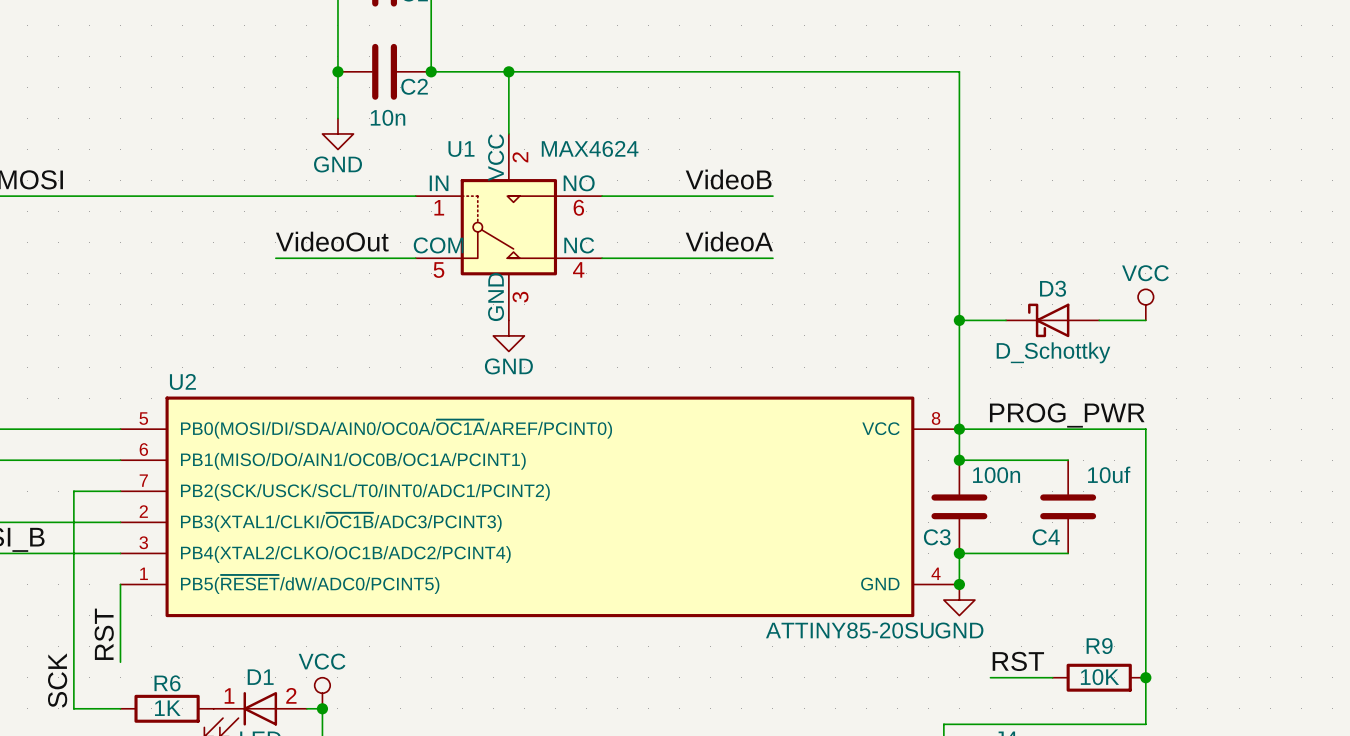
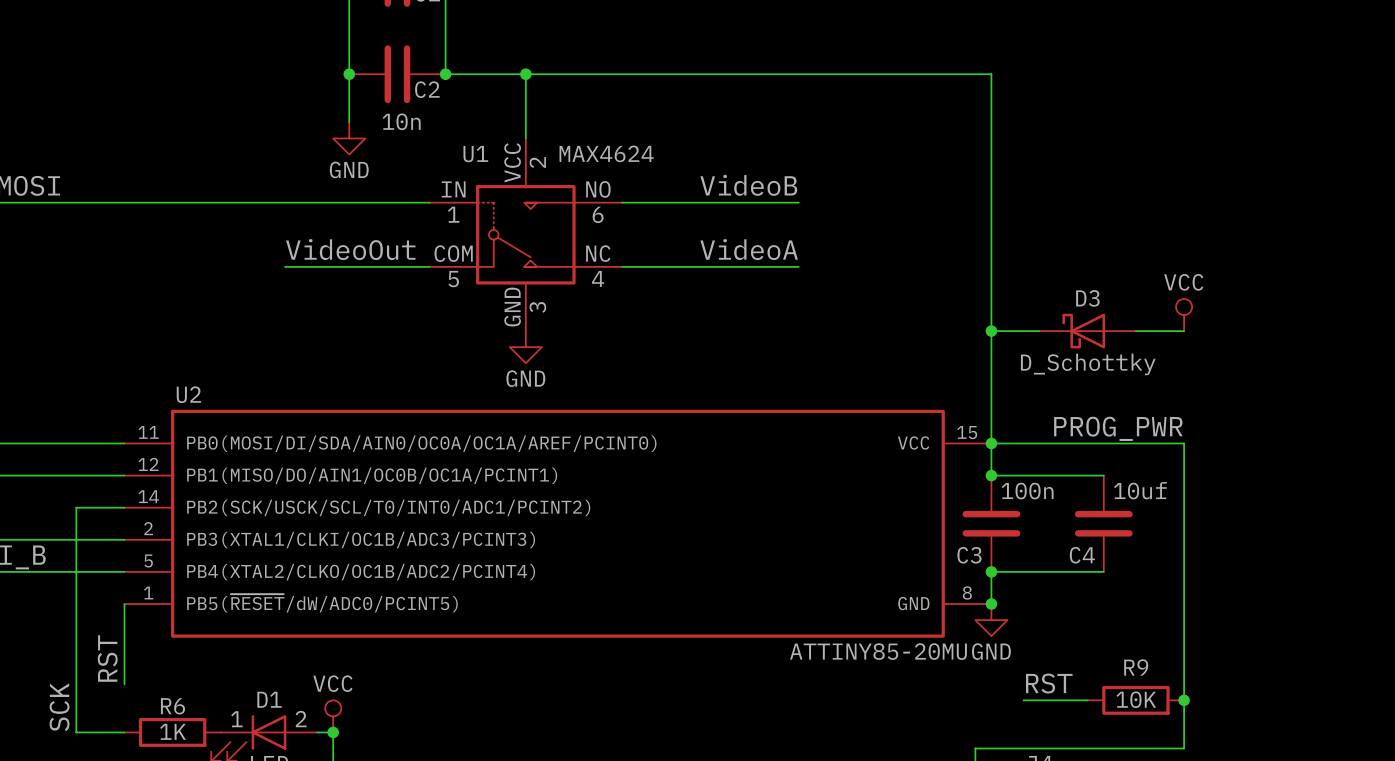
U2 pin number: 5 (143, 418) -> 11 (148, 432)
U2 pin number: 8 (936, 418) -> 15 (967, 432)
U2 pin name: PB0(MOSI/DI/SDA/AIN0/OC0A/~{OC1A}/AREF/PCINT0) (396, 429) -> PB0(MOSI/DI/SDA/AIN0/OC0A/OC1A/AREF/PCINT0) (421, 443)
U2 pin number: 6 (143, 449) -> 12 (148, 464)
U2 pin number: 7 (143, 480) -> 14 (148, 496)
U2 pin name: PB3(XTAL1/CLKI/~{OC1B}/ADC3/PCINT3) (341, 522) -> PB3(XTAL1/CLKI/OC1B/ADC3/PCINT3) (361, 540)
U2 pin number: 3 (143, 542) -> 5 (148, 560)
U2 pin number: 4 (936, 573) -> 8 (967, 592)
U2 value: ATTINY85-20SU (849, 630) -> ATTINY85-20MU (878, 651)

